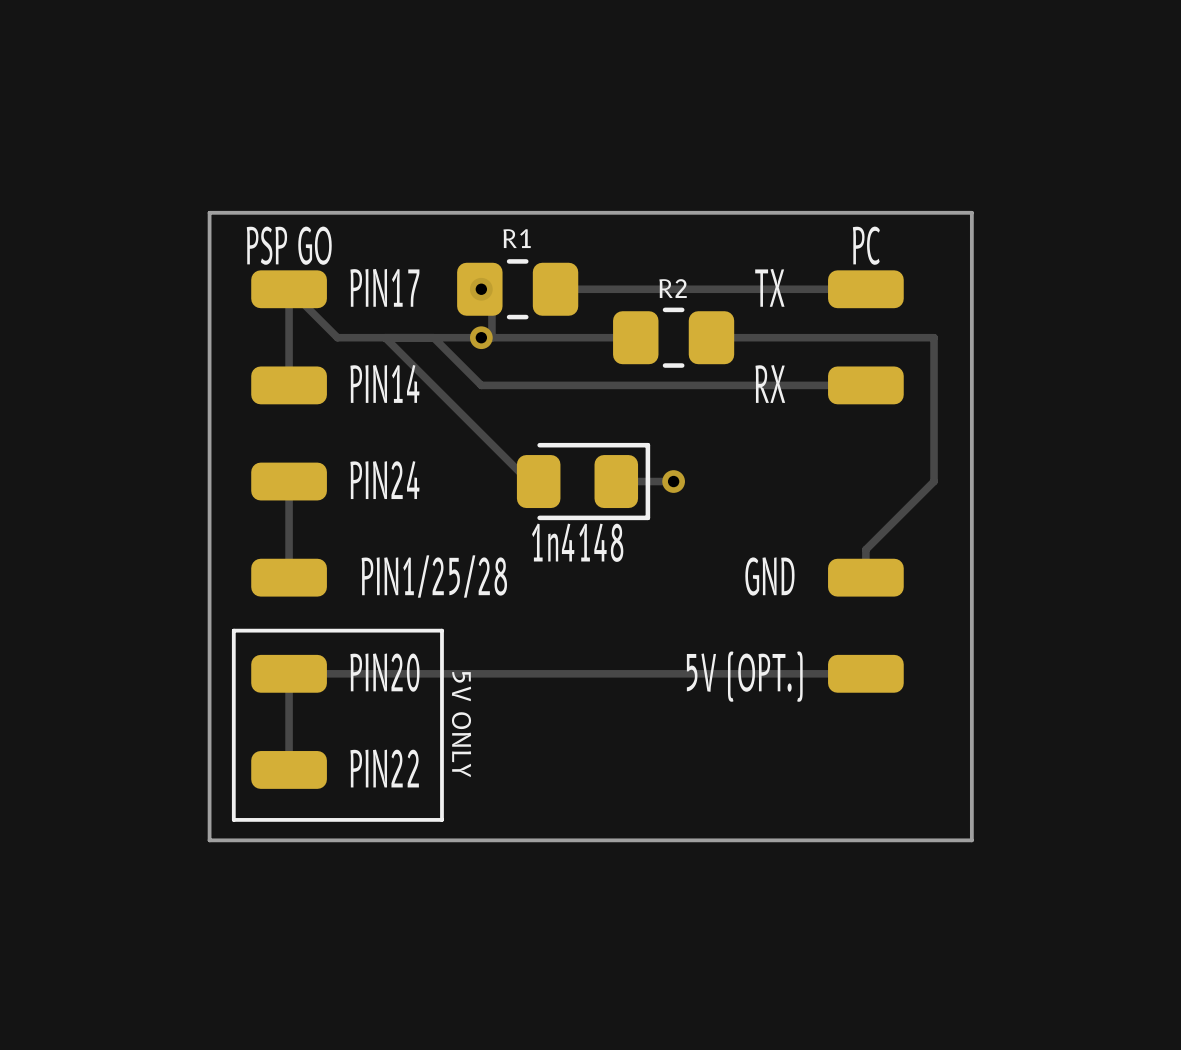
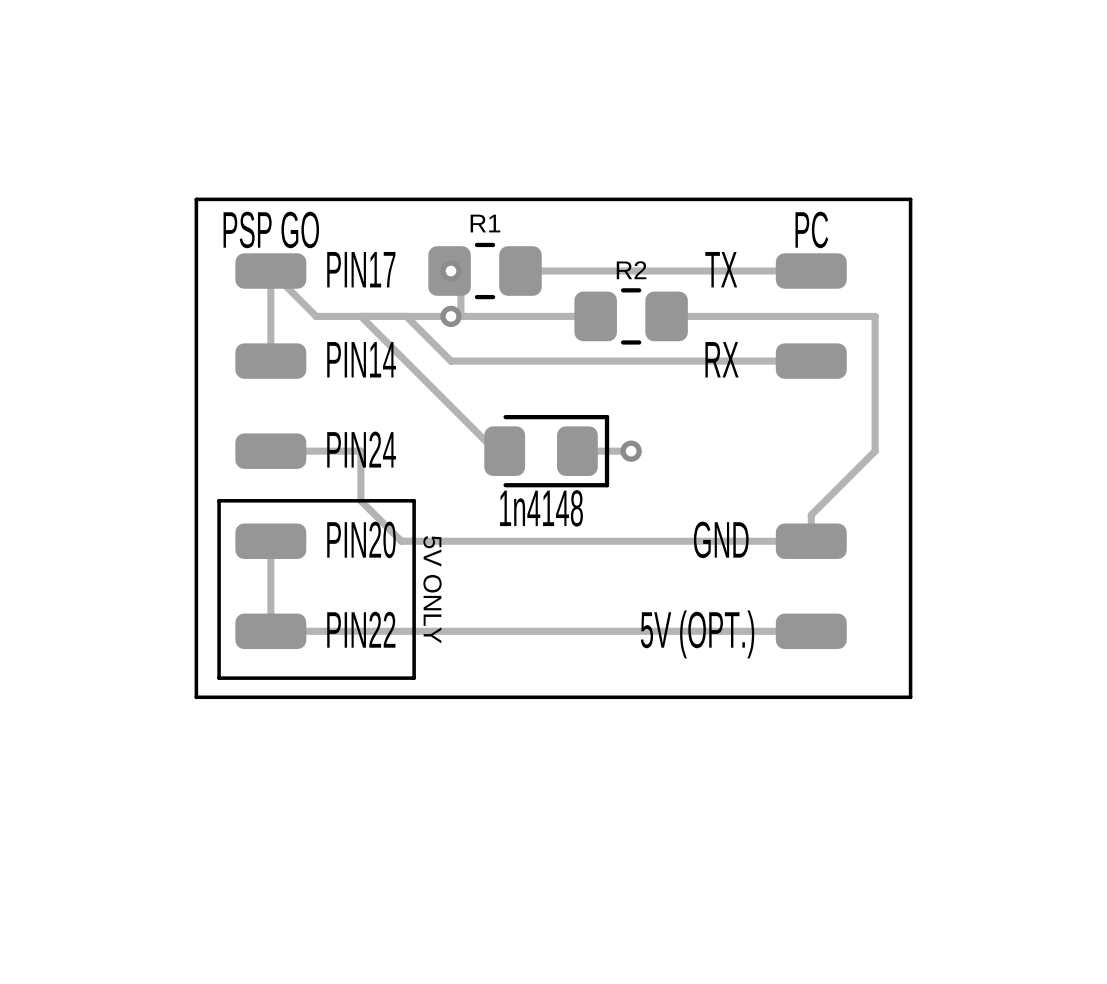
track: (289, 481) (289, 577) -> (270, 631) (270, 541)
track: none -> (270, 451) (360, 451) (360, 500) (401, 541) (811, 541)
text: none -> PIN20 (361, 539)
text: PIN1/25/28 (434, 576) -> none
line: (233, 630) (441, 630) -> (219, 590) (219, 500) (414, 500) (414, 590)
text: PIN20 (384, 672) -> PIN22 (361, 629)
track: (289, 673) (289, 769) -> none
line: (233, 723) (233, 819) (441, 819) (441, 723) -> (219, 678) (414, 678)
text position: 5V ONLY (461, 724) -> 5V ONLY (432, 589)
board edge: (209, 744) (209, 840) (971, 840) (971, 744) -> (196, 697) (910, 697)
text: PIN22 (384, 768) -> none
part: (289, 769) -> none

